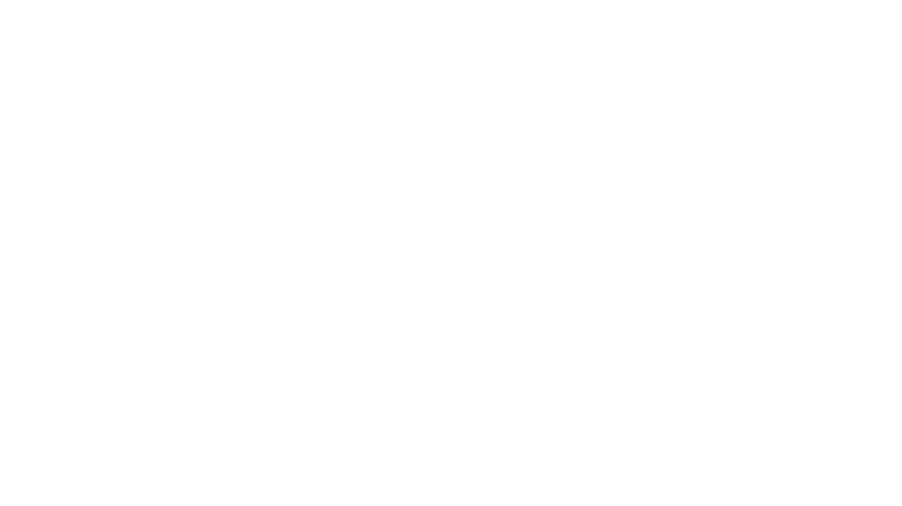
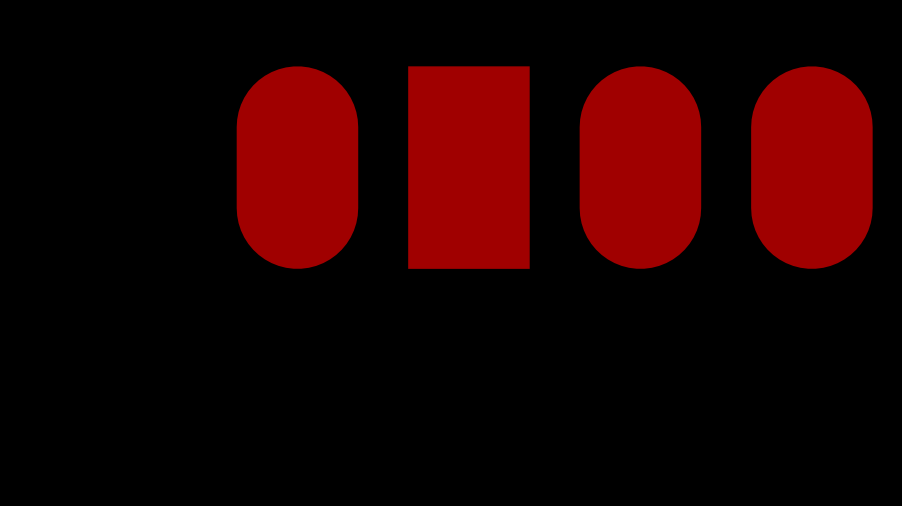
part: none -> (554, 167)

